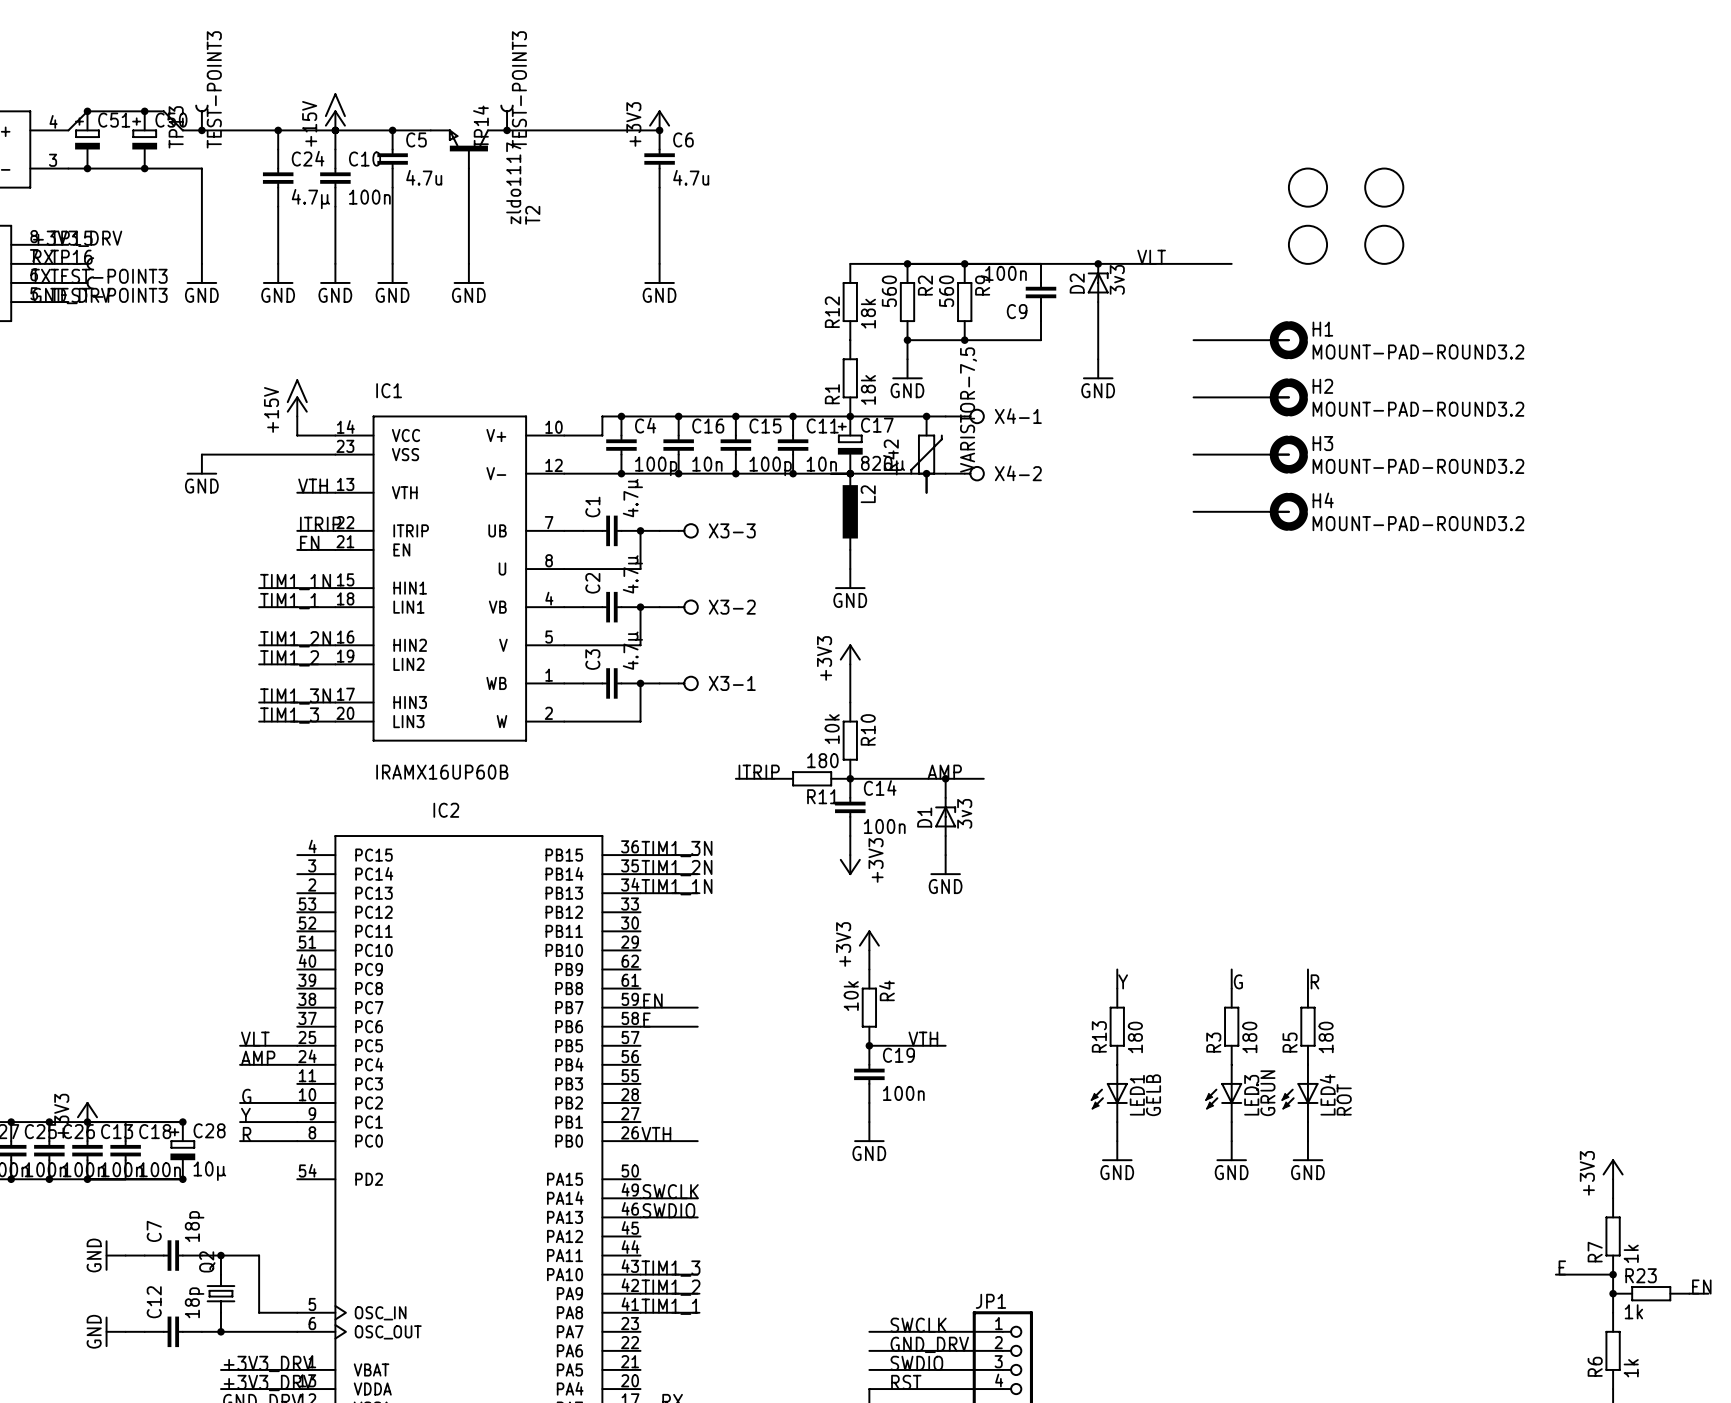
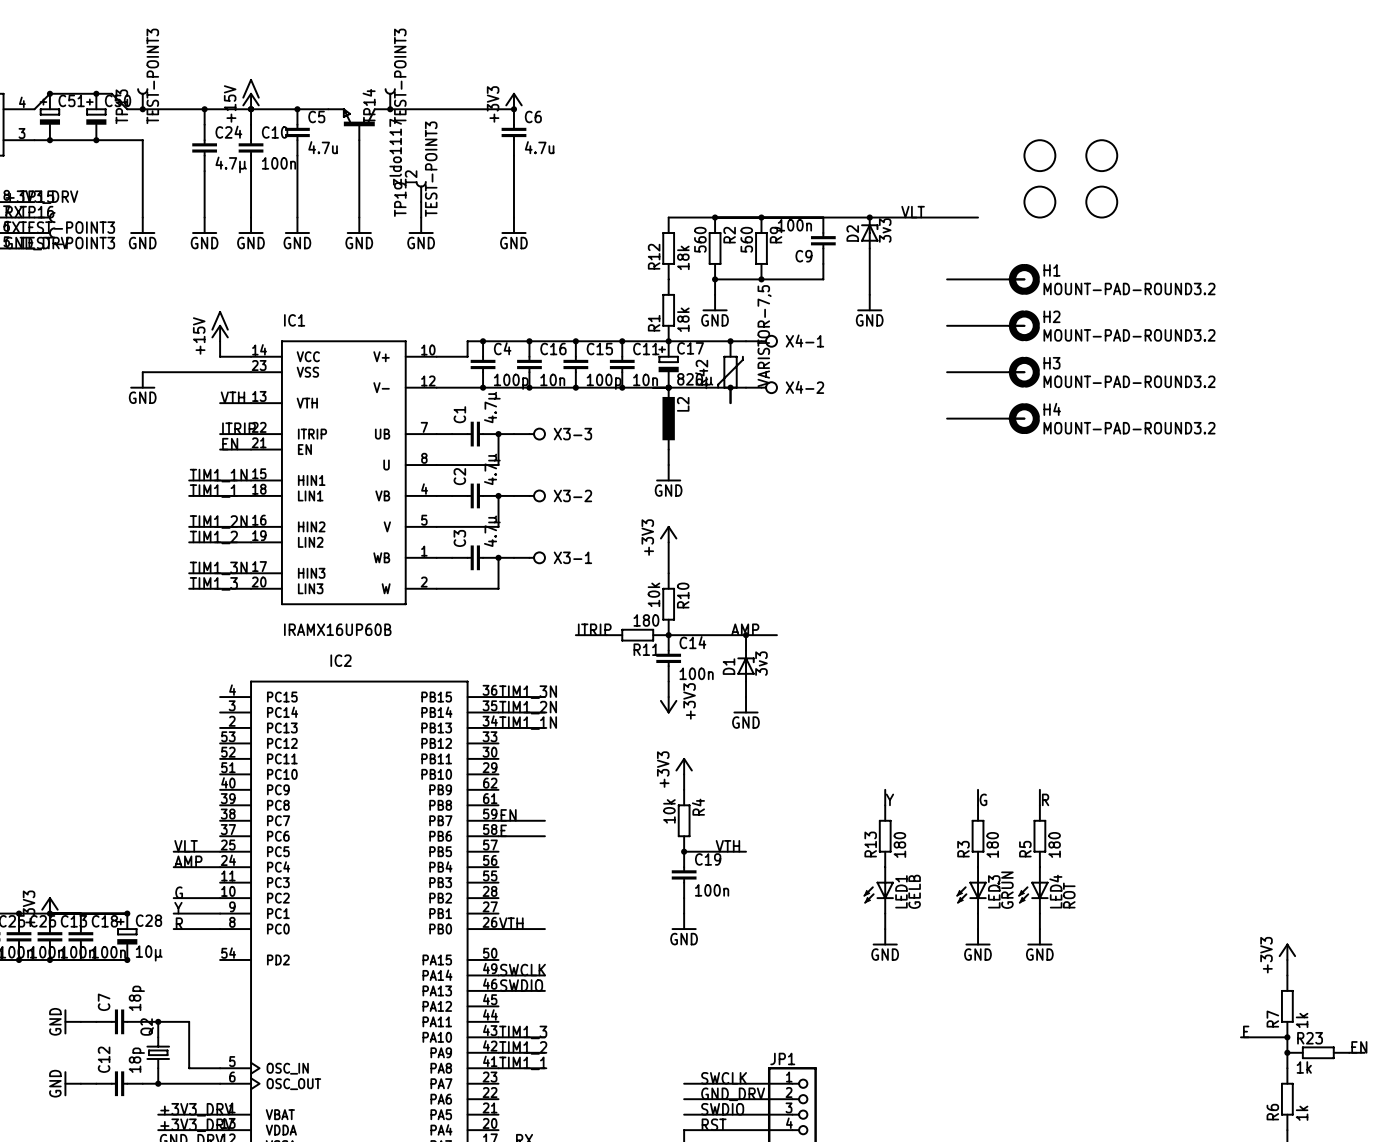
TP19: none -> TEST-POINT3 (421, 192)
wire: none -> (421, 202) (421, 217)
power symbol: none -> GND (421, 225)

